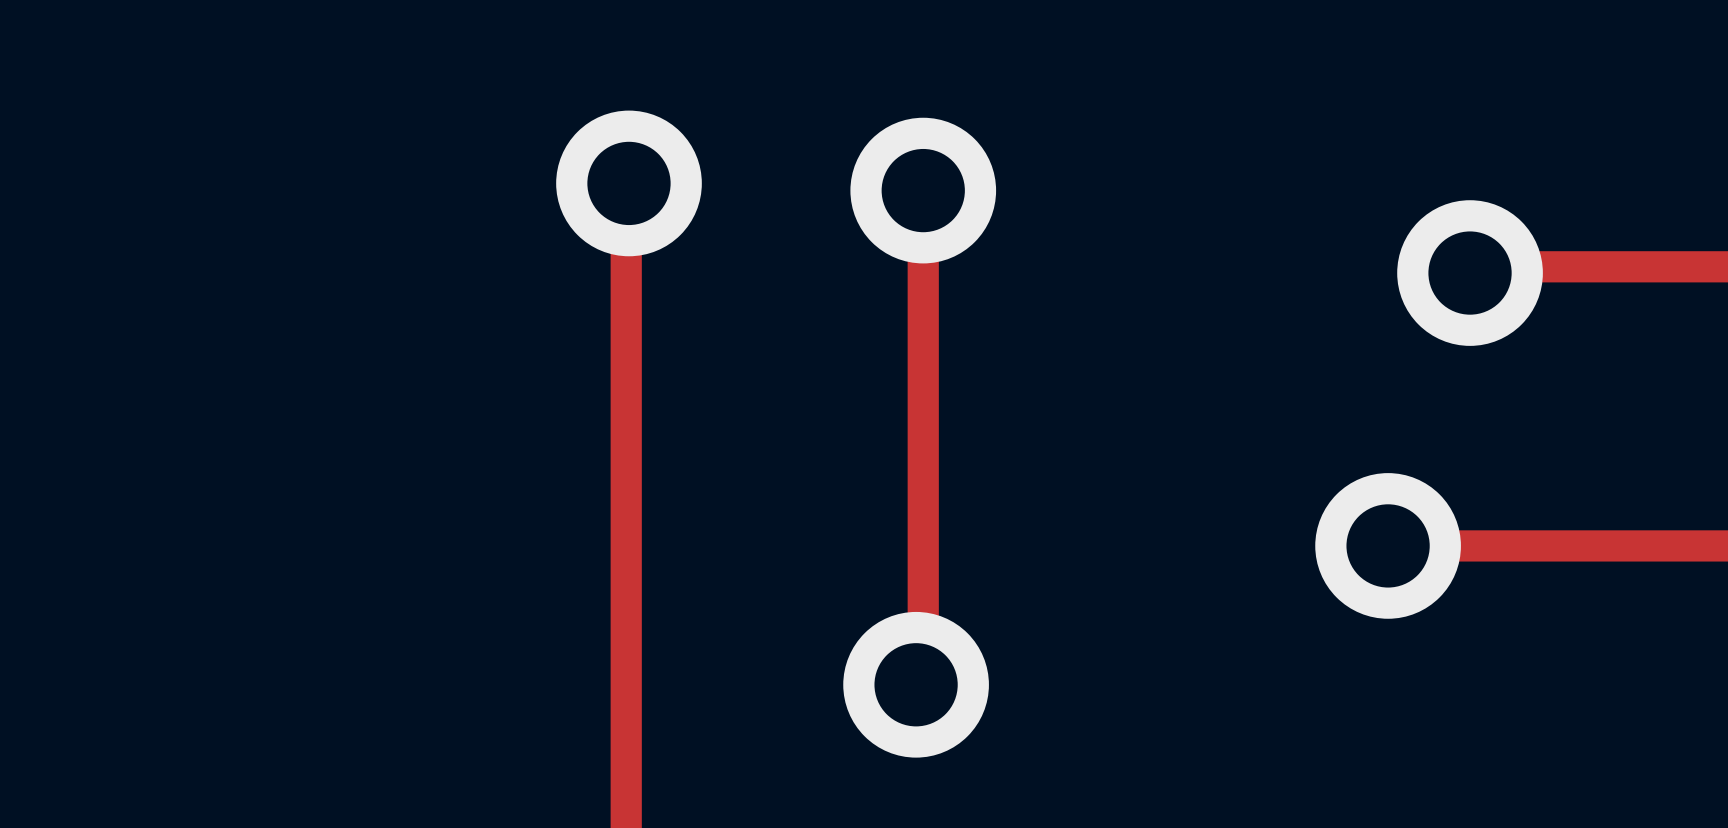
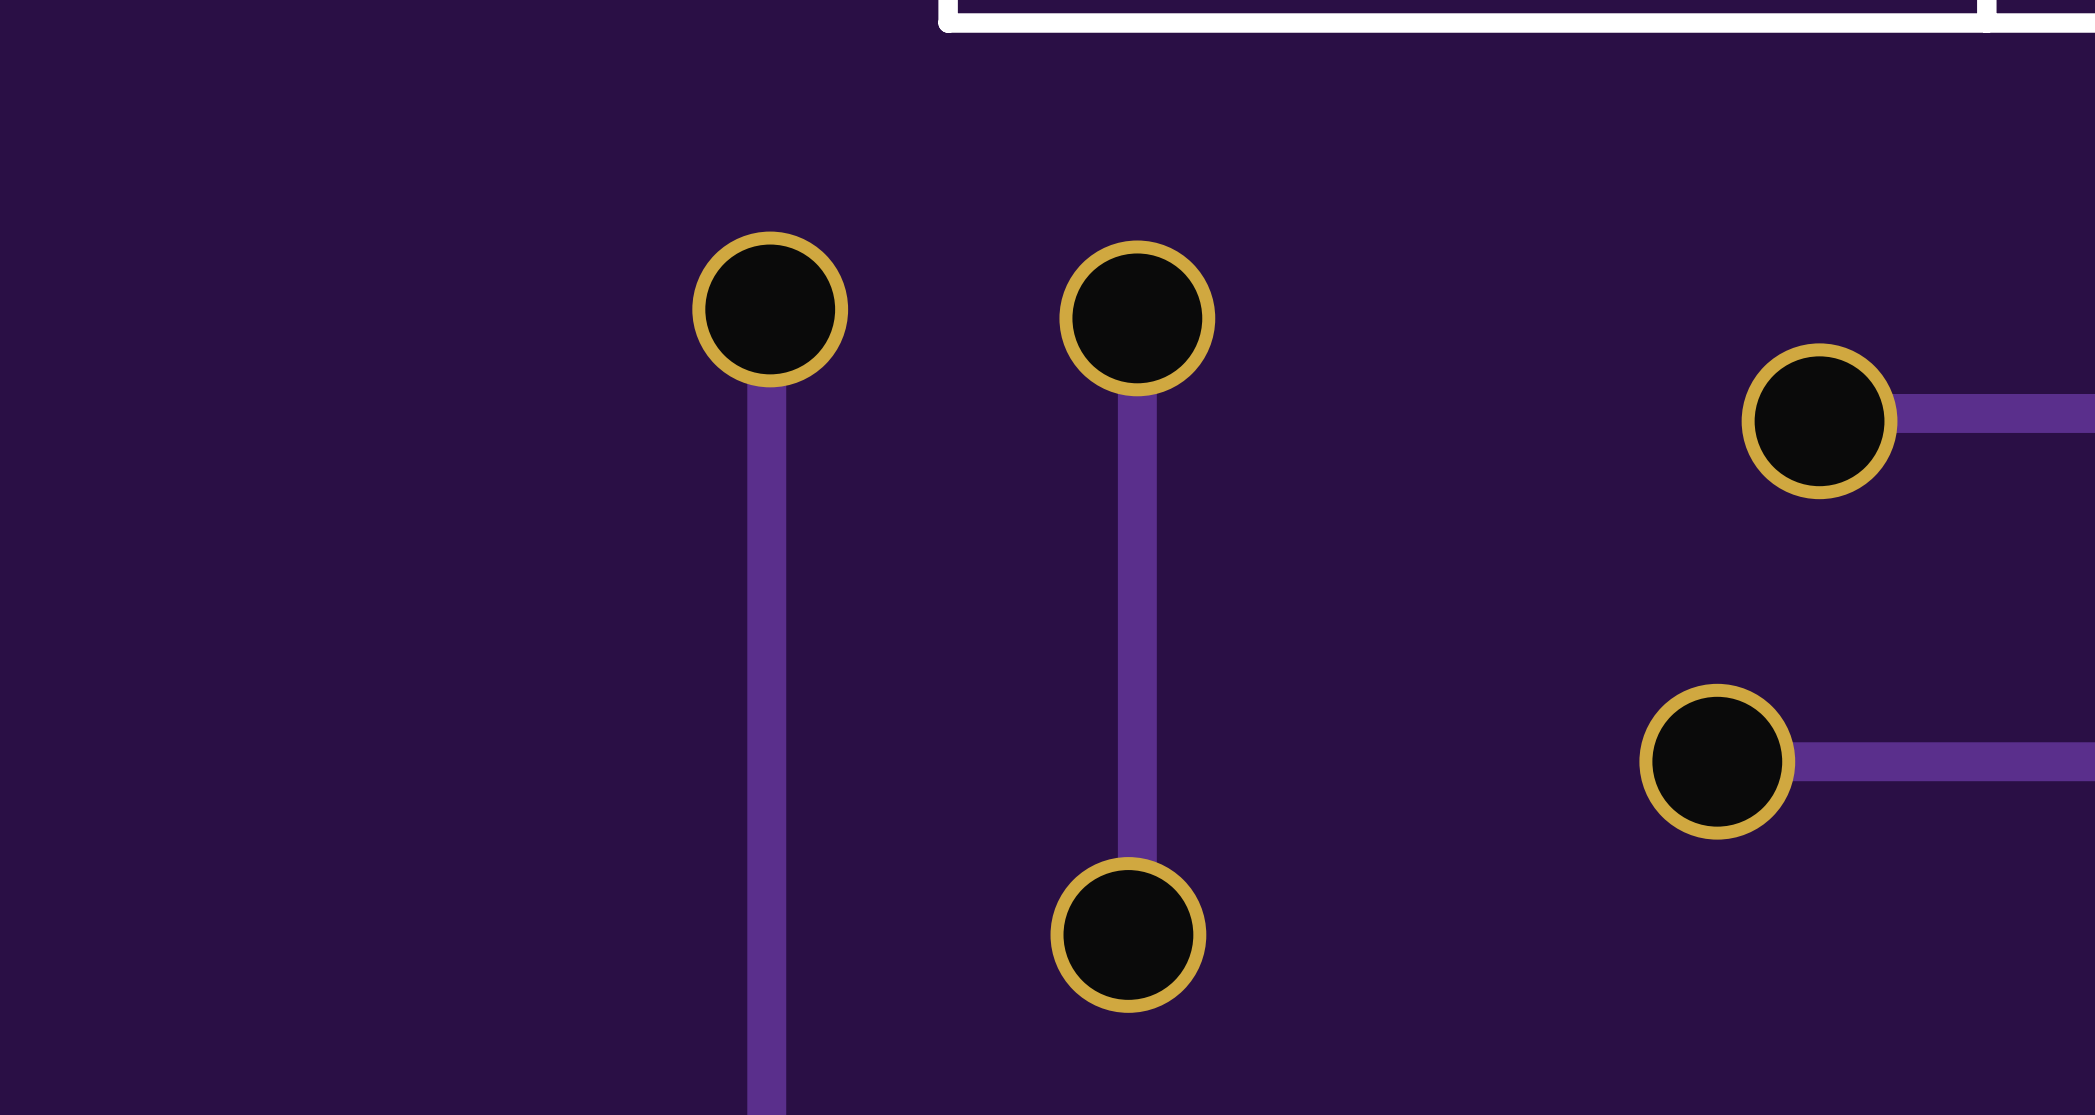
via size: [556, 110, 702, 257] -> [692, 231, 849, 388]
via size: [850, 117, 997, 264] -> [1059, 240, 1216, 397]
via size: [1397, 200, 1543, 346] -> [1741, 343, 1898, 500]
via size: [1315, 473, 1461, 619] -> [1639, 683, 1796, 840]
via size: [843, 611, 989, 758] -> [1050, 857, 1207, 1013]

